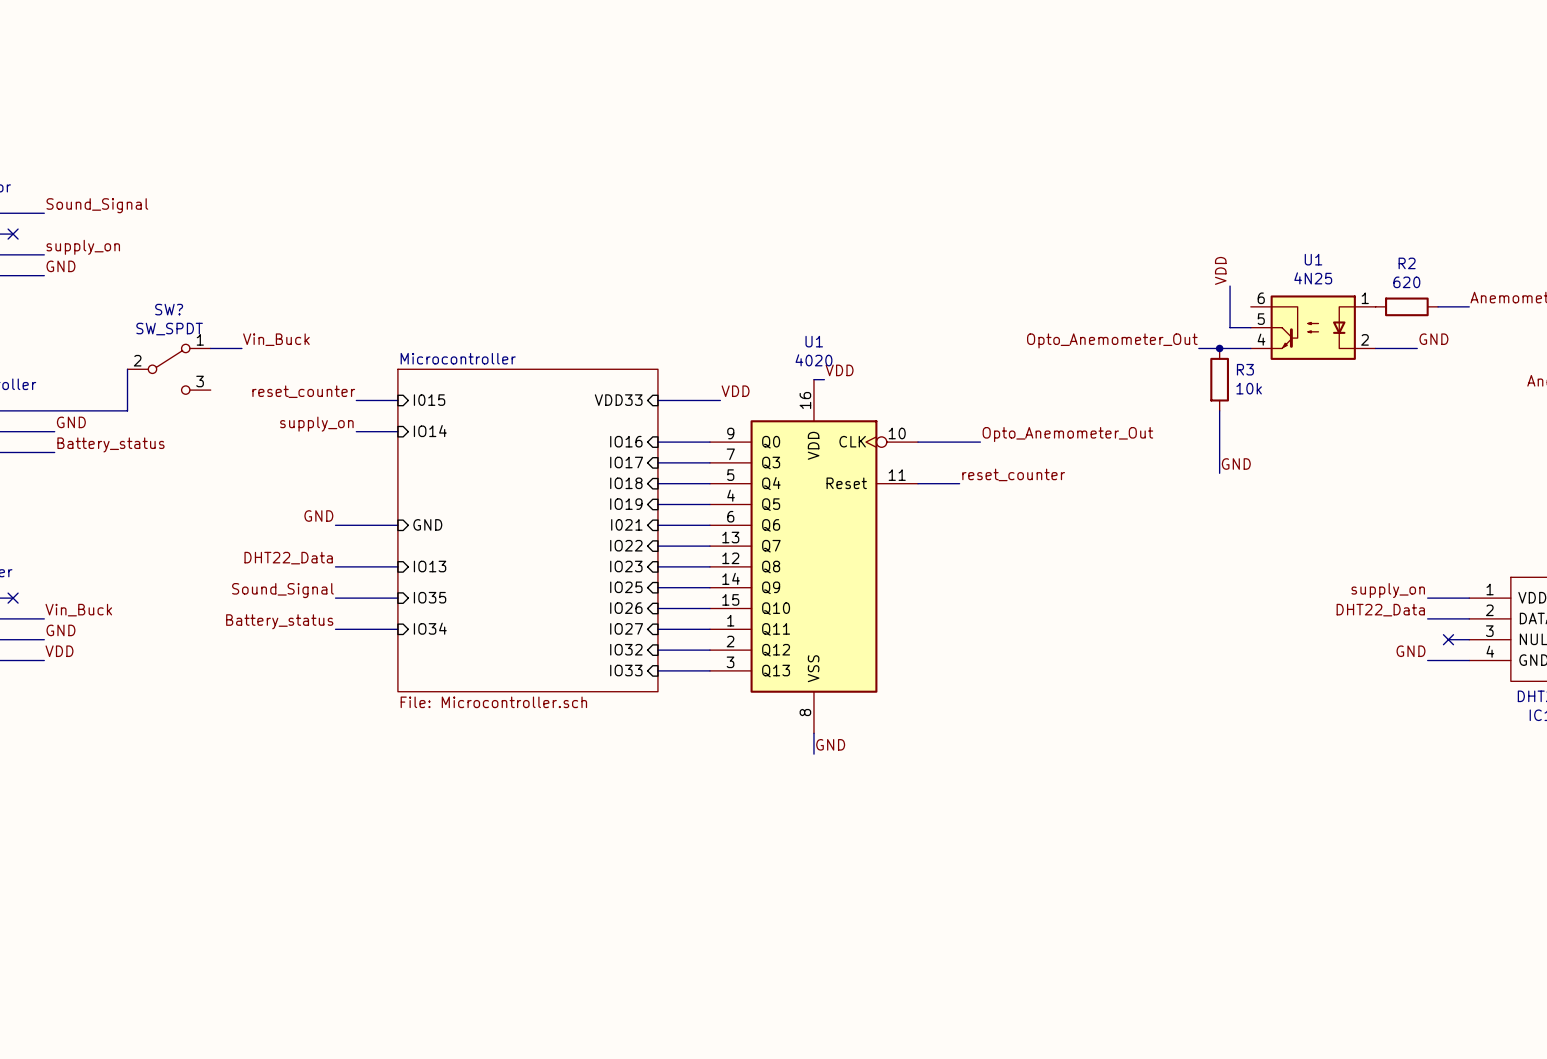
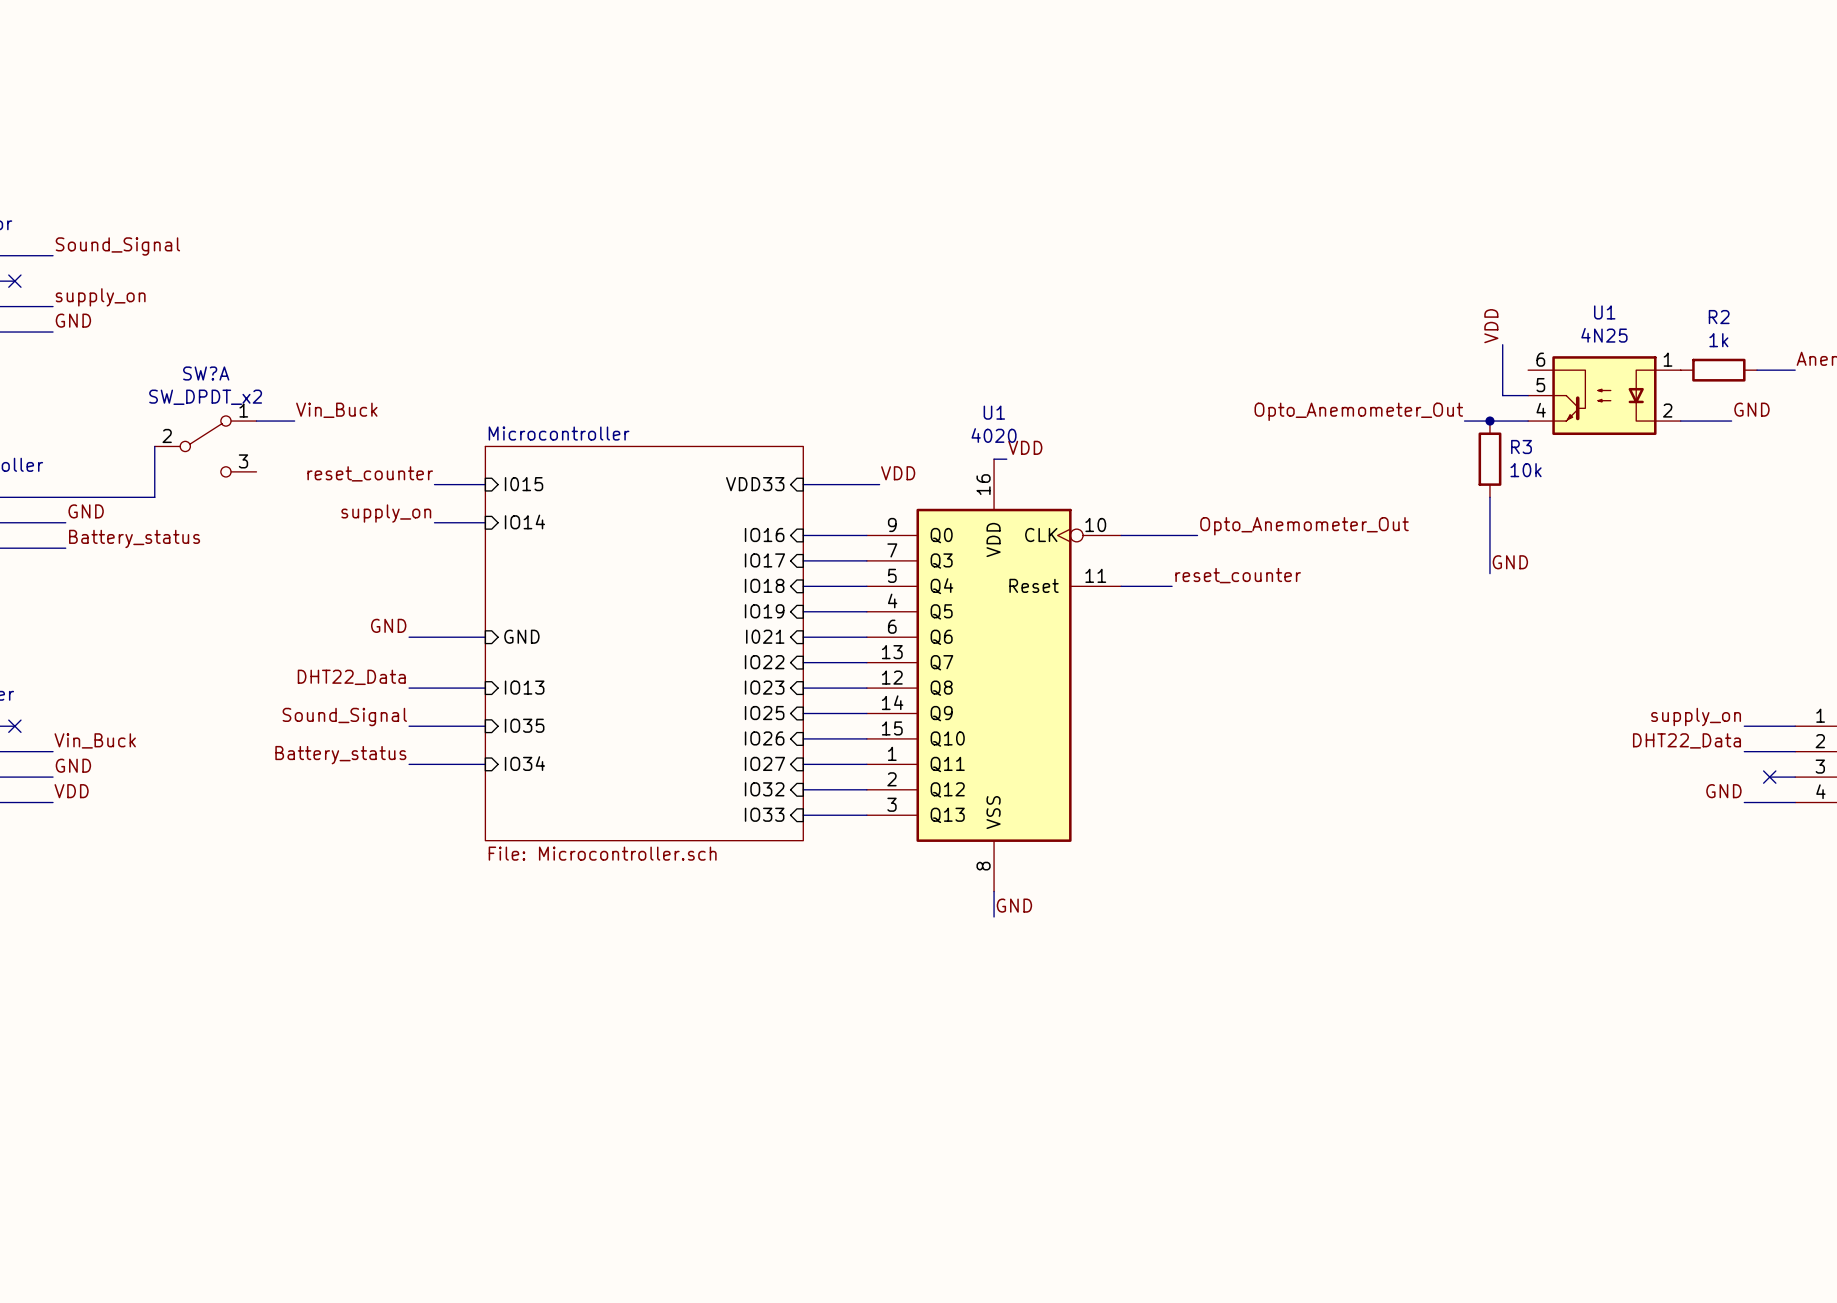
R2 value: 620 (1406, 282) -> 1k (1718, 340)
SW? name: SW? (169, 309) -> SW?A (206, 373)
SW? value: SW_SPDT (169, 329) -> SW_DPDT_x2 (205, 397)

